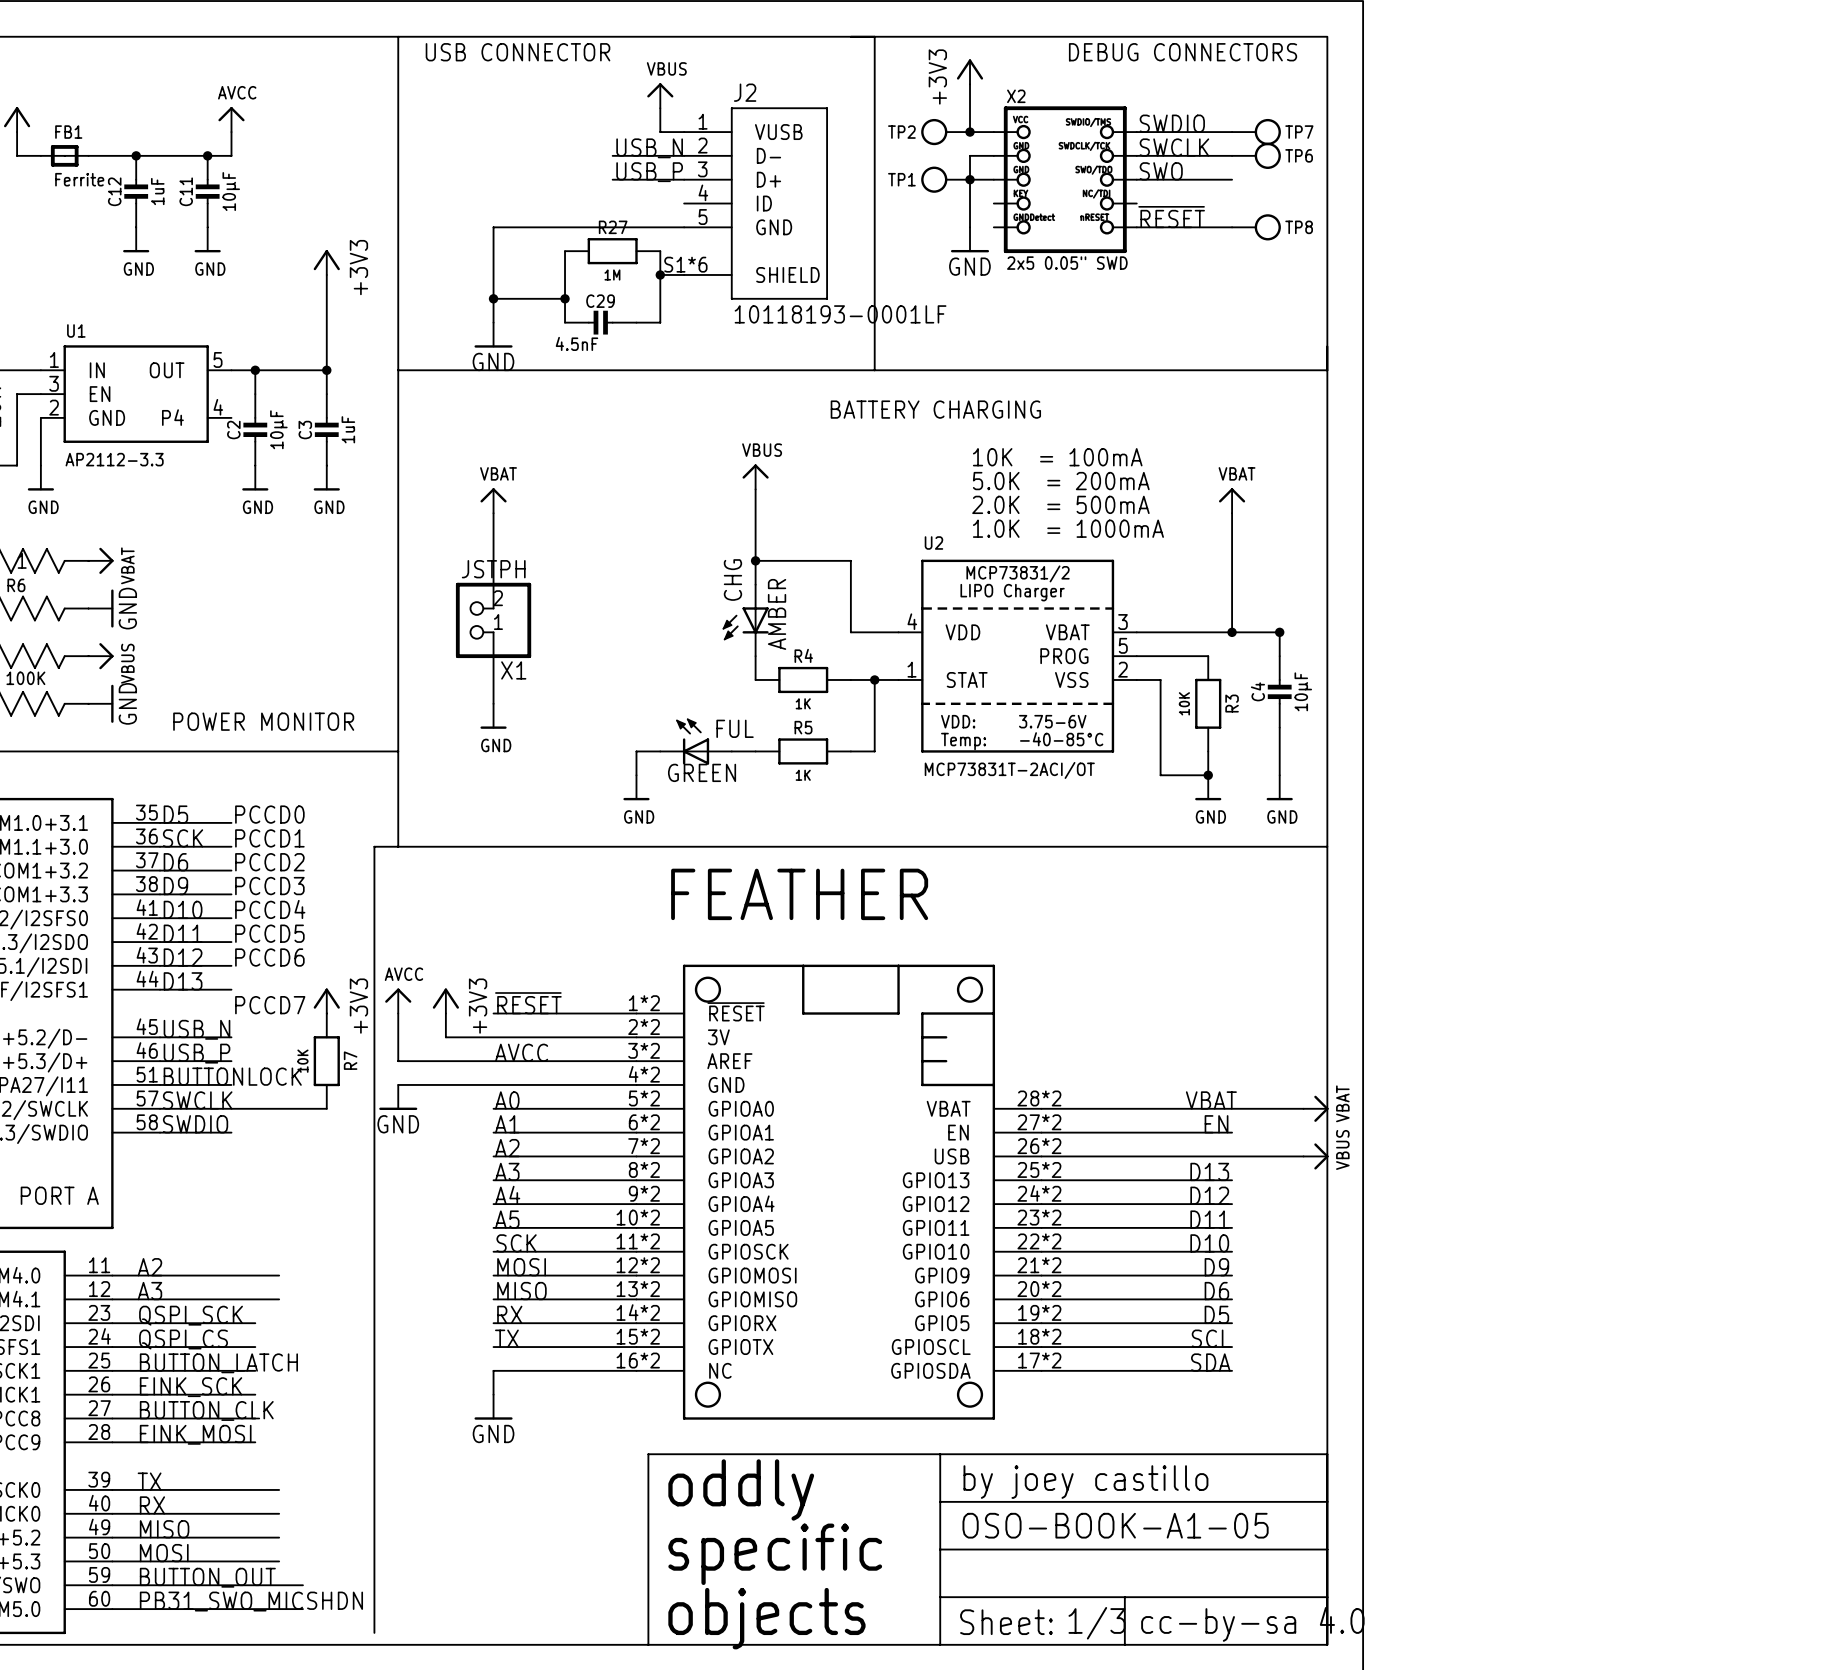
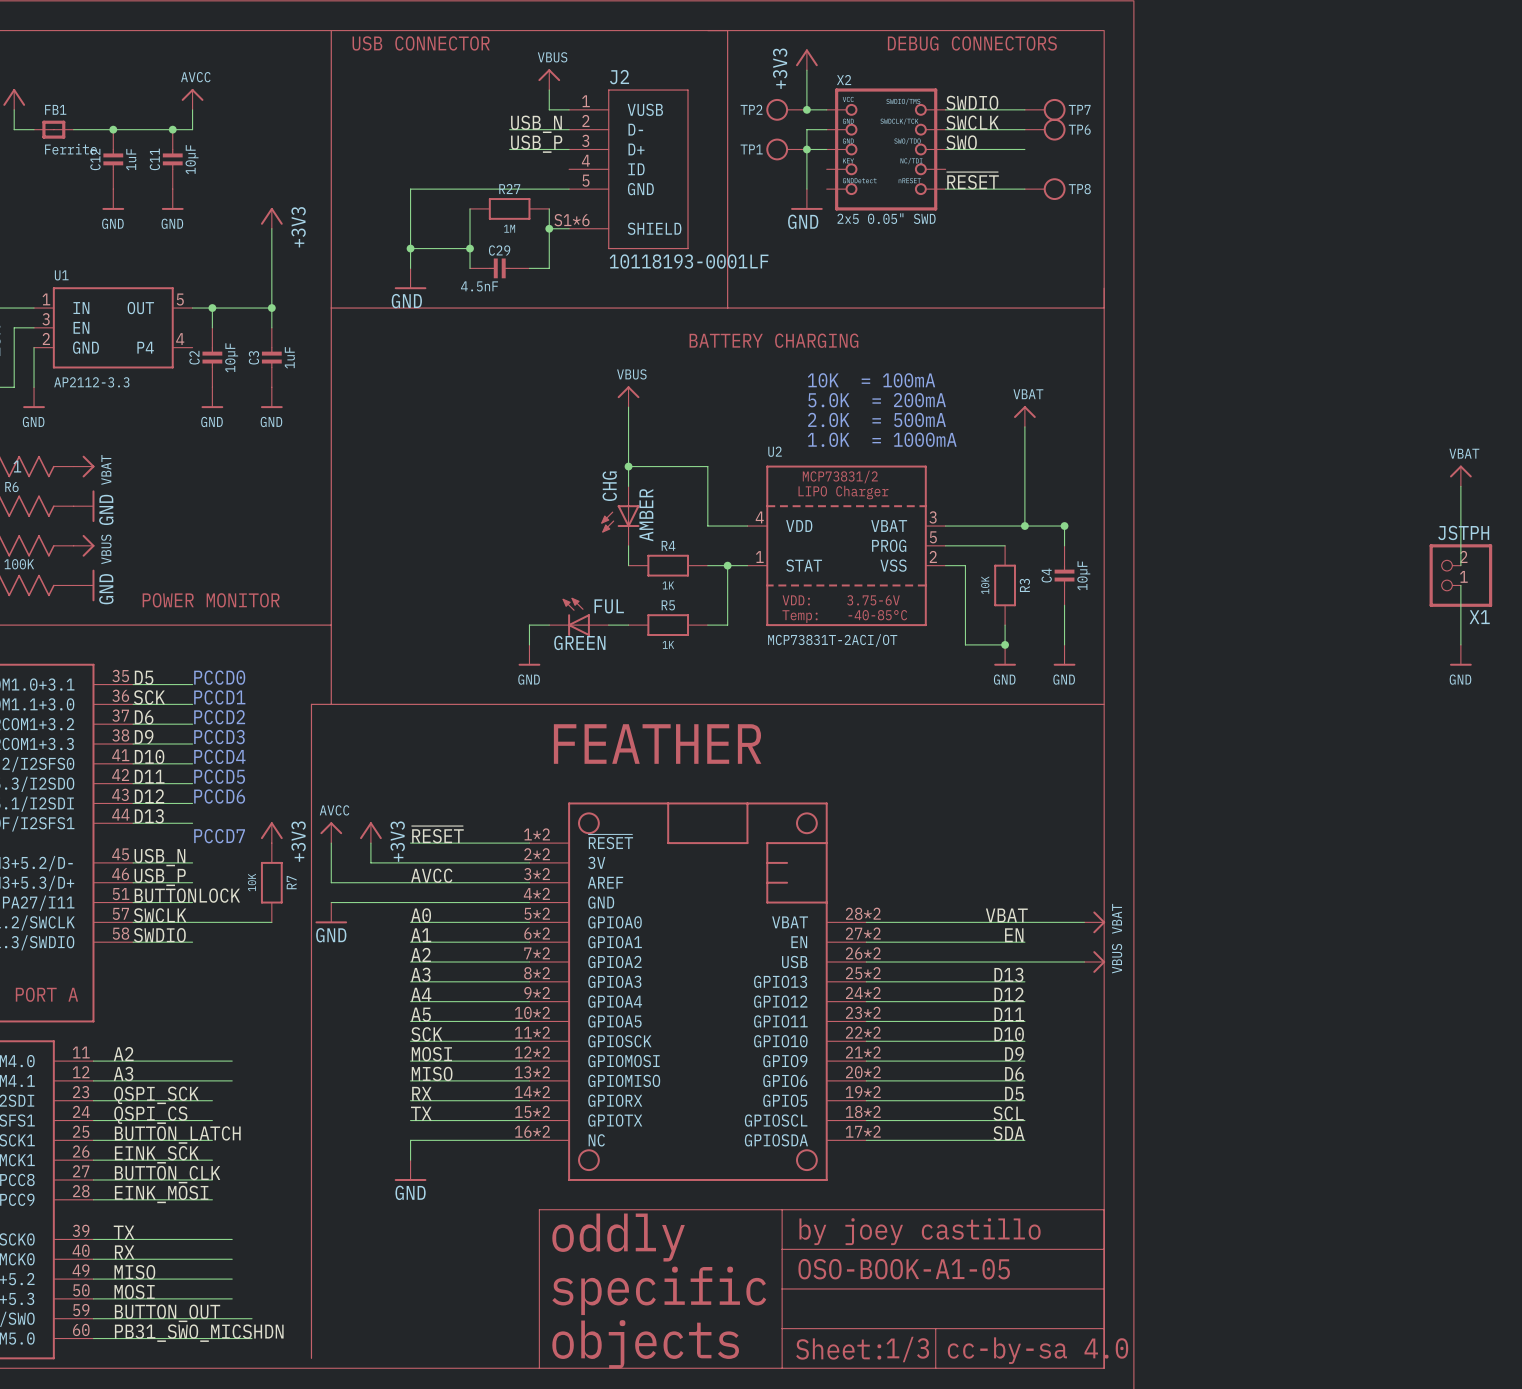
power symbol: VBAT (493, 500) -> none
wire: (493, 513) (493, 608) -> none
power symbol: none -> VBAT (1460, 475)
wire: none -> (1460, 486) (1460, 565)
X1 position: (493, 620) -> (1460, 575)
wire: (493, 632) (493, 703) -> none
wire: none -> (1460, 585) (1460, 644)
power symbol: GND (493, 716) -> none
power symbol: none -> GND (1460, 655)

